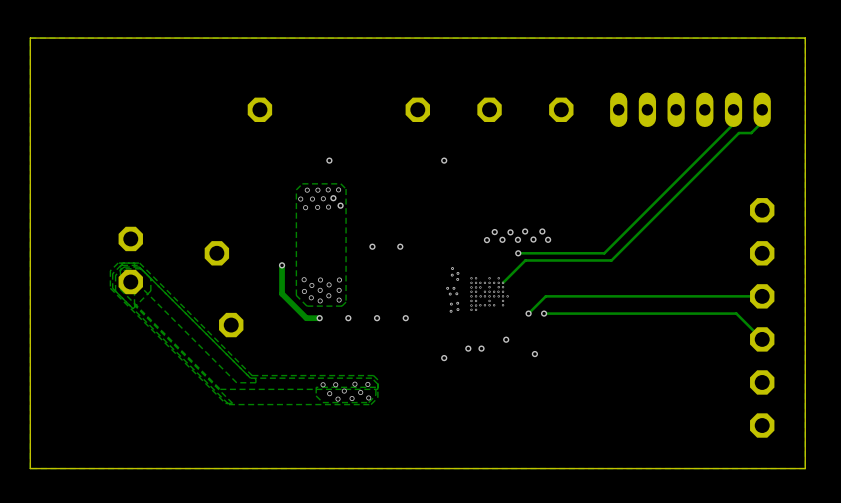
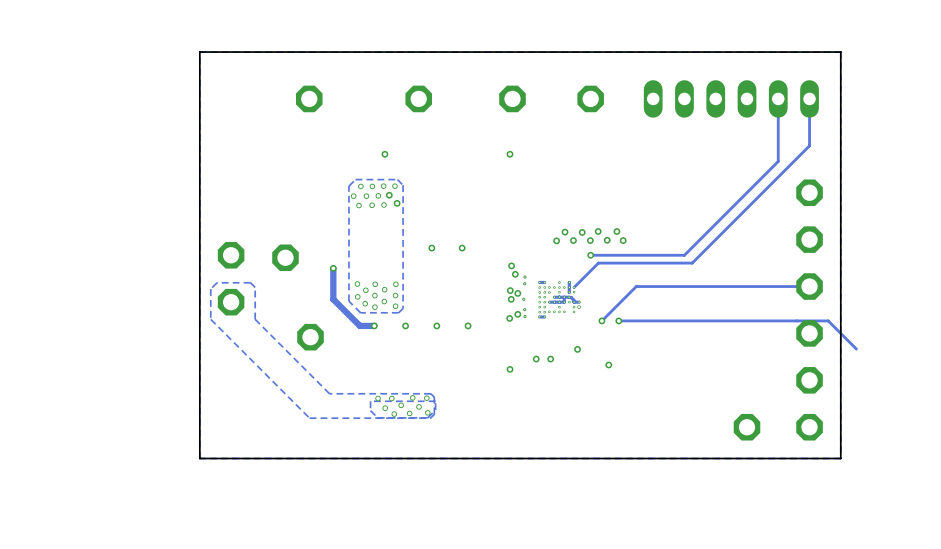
board edge: (805, 38) (30, 38) (30, 468) (805, 468) (805, 38) -> (840, 52) (840, 458) (199, 458) (199, 52) (840, 52)
part: none -> (418, 98)
part: (417, 109) -> none
part: none -> (512, 98)
part: (489, 109) -> none
part: none -> (590, 98)
part: (561, 109) -> none
part position: (690, 109) -> (731, 98)
track: (733, 109) (733, 124) (690, 167) -> (778, 98) (778, 161)
track: (762, 109) (762, 122) (751, 133) (738, 133) (719, 152) -> (809, 98) (809, 145)
part: none -> (809, 192)
part: (762, 210) -> none
part: (130, 238) -> none
part: none -> (809, 239)
part: none -> (231, 255)
part: (216, 253) -> none
part: (762, 253) -> none
part: none -> (285, 257)
zone outline: (123, 263) (112, 273) (112, 288) (228, 404) (371, 404) (377, 397) (377, 379) (373, 375) (247, 375) -> none
zone outline: (134, 263) (134, 305) (232, 403) (225, 403) (110, 288) (110, 270) (118, 263) (139, 263) (255, 379) (255, 382) (236, 382) (120, 266) -> none
via: none -> (511, 265)
zone outline: (121, 265) (137, 265) (250, 378) (371, 378) (377, 384) -> none
zone outline: (139, 267) (123, 267) (115, 275) (115, 291) -> none
zone outline: (141, 268) (120, 268) (120, 289) (220, 389) (377, 389) -> none
via: (452, 268) -> none
via: none -> (515, 274)
via: (452, 275) -> none
zone outline: (150, 278) (150, 290) (133, 308) -> none
zone outline: none -> (250, 282) (217, 282) (210, 289) (210, 319) (309, 418) (430, 418) (434, 414) (434, 397) (430, 393) (329, 393) (255, 319) (255, 287) (250, 282)
track: none -> (544, 282) (539, 282)
track: none -> (569, 282) (569, 292)
part: (130, 282) -> none
part: none -> (809, 286)
via: none -> (510, 290)
via: (447, 288) -> none
via: none -> (517, 293)
via: (453, 288) -> none
track: none -> (554, 297) (571, 297) (574, 302) (579, 302)
track: none -> (564, 297) (564, 302) (549, 302)
via: (503, 291) -> none
via: none -> (511, 299)
via: (450, 294) -> none
part: none -> (231, 302)
track: (762, 296) (545, 296) -> (809, 286) (636, 286) (620, 302)
part: (762, 296) -> none
via: none -> (579, 307)
via: (451, 304) -> none
via: none -> (517, 314)
track: none -> (544, 316) (539, 316)
via: none -> (509, 318)
via: (451, 311) -> none
part: (231, 325) -> none
part: none -> (809, 333)
part: none -> (310, 337)
part: (762, 339) -> none
part: none -> (809, 380)
part: (762, 382) -> none
part: none -> (747, 427)
part: none -> (809, 427)
part: (762, 425) -> none

